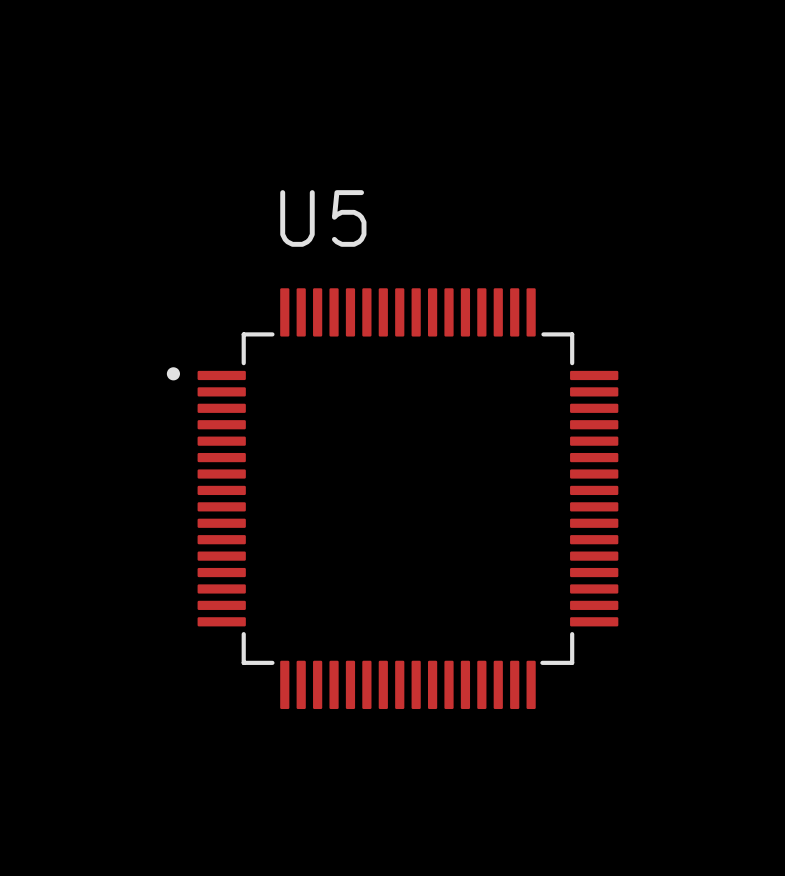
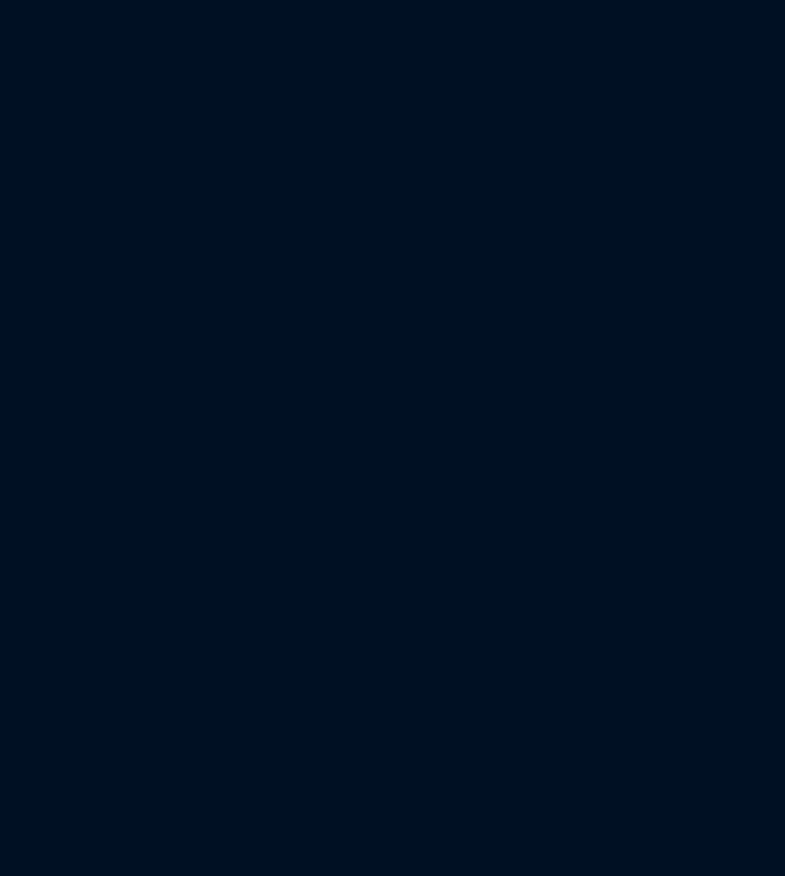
U5: (392, 498) -> none

